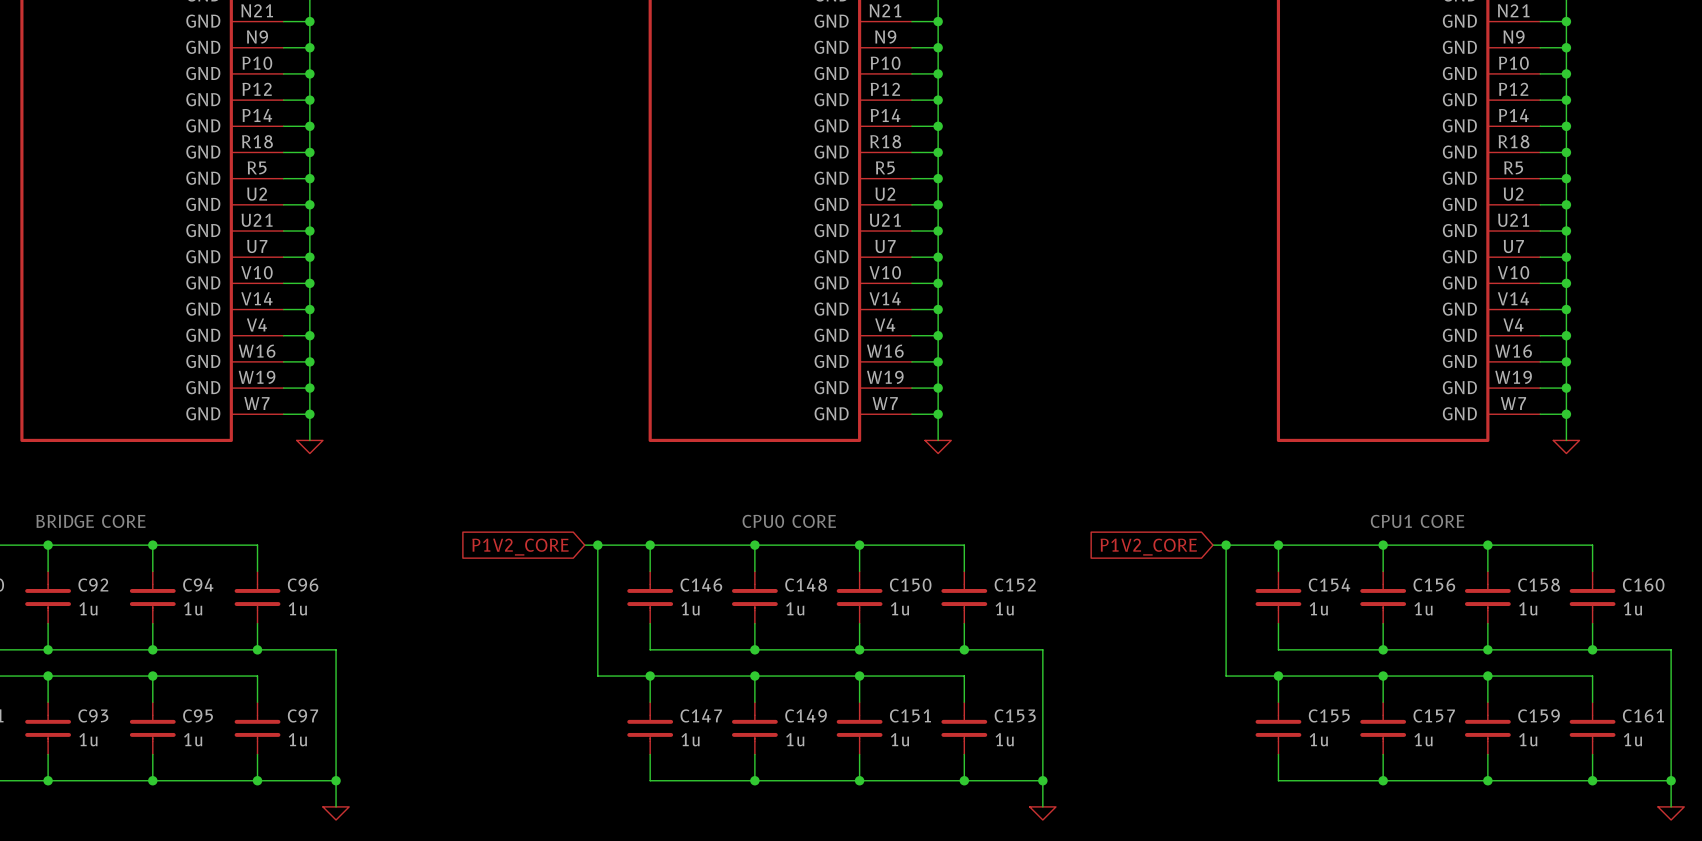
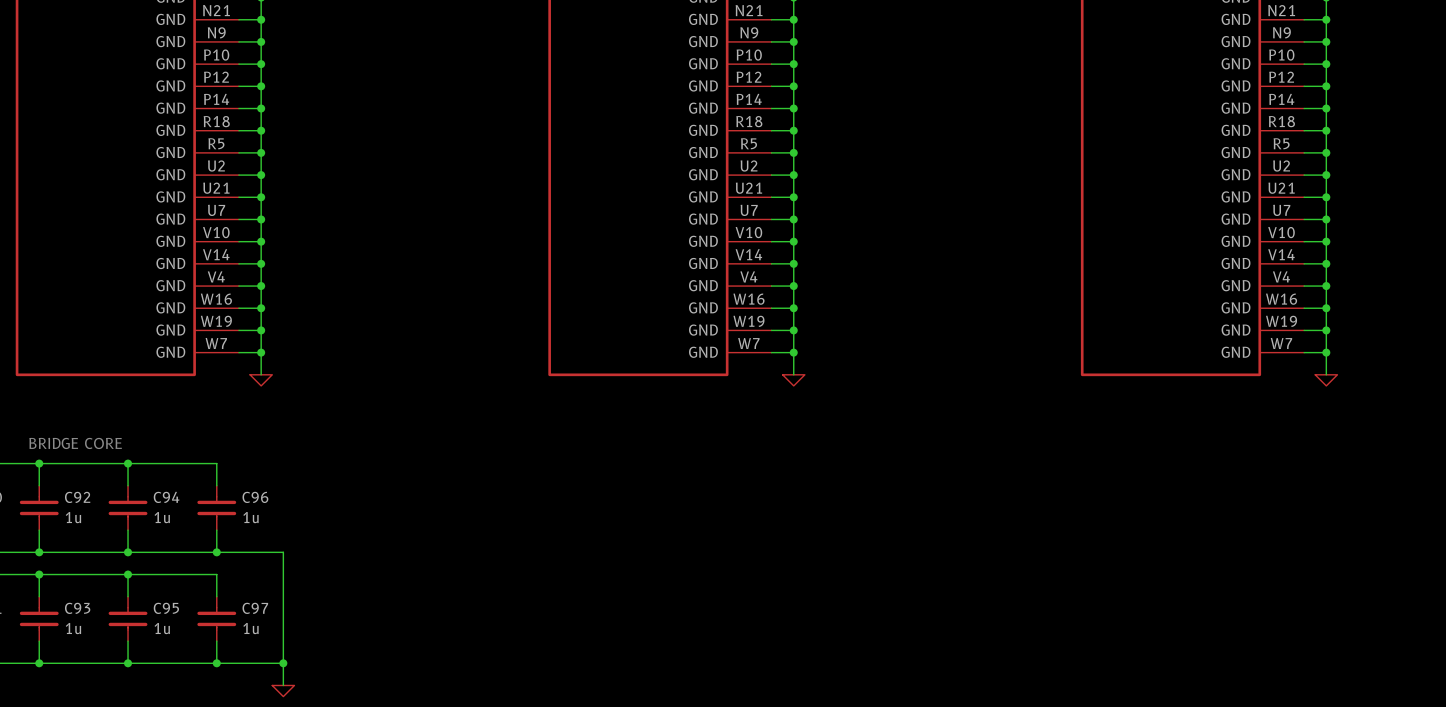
text: CPU0 CORE (789, 521) -> none
text: CPU1 CORE (1417, 521) -> none
wire: (584, 545) (964, 545) (964, 571) -> none
wire: (597, 545) (597, 676) (964, 676) (964, 702) -> none
junction: (597, 545) -> none
wire: (650, 545) (650, 571) -> none
junction: (650, 545) -> none
wire: (754, 545) (754, 571) -> none
junction: (754, 545) -> none
wire: (859, 545) (859, 571) -> none
junction: (859, 545) -> none
wire: (1213, 545) (1592, 545) (1592, 571) -> none
wire: (1226, 545) (1226, 676) (1592, 676) (1592, 702) -> none
junction: (1226, 545) -> none
wire: (1278, 545) (1278, 571) -> none
junction: (1278, 545) -> none
wire: (1383, 545) (1383, 571) -> none
junction: (1383, 545) -> none
wire: (1487, 545) (1487, 571) -> none
junction: (1487, 545) -> none
global label: P1V2_CORE (520, 547) -> none
global label: P1V2_CORE (1148, 547) -> none
C146: 1u (650, 597) -> none
C148: 1u (754, 597) -> none
C150: 1u (859, 597) -> none
C152: 1u (964, 597) -> none
C154: 1u (1278, 597) -> none
C156: 1u (1383, 597) -> none
C158: 1u (1487, 597) -> none
C160: 1u (1592, 597) -> none
wire: (650, 623) (650, 649) (1042, 649) (1042, 806) -> none
wire: (754, 623) (754, 649) -> none
wire: (859, 623) (859, 649) -> none
wire: (964, 623) (964, 649) -> none
wire: (1278, 623) (1278, 649) (1671, 649) (1671, 806) -> none
wire: (1383, 623) (1383, 649) -> none
wire: (1487, 623) (1487, 649) -> none
wire: (1592, 623) (1592, 649) -> none
junction: (754, 649) -> none
junction: (859, 649) -> none
junction: (964, 649) -> none
junction: (1383, 649) -> none
junction: (1487, 649) -> none
junction: (1592, 649) -> none
wire: (650, 676) (650, 702) -> none
junction: (650, 676) -> none
wire: (754, 676) (754, 702) -> none
junction: (754, 676) -> none
wire: (859, 676) (859, 702) -> none
junction: (859, 676) -> none
wire: (1278, 676) (1278, 702) -> none
junction: (1278, 676) -> none
wire: (1383, 676) (1383, 702) -> none
junction: (1383, 676) -> none
wire: (1487, 676) (1487, 702) -> none
junction: (1487, 676) -> none
C147: 1u (650, 728) -> none
C149: 1u (754, 728) -> none
C151: 1u (859, 728) -> none
C153: 1u (964, 728) -> none
C155: 1u (1278, 728) -> none
C157: 1u (1383, 728) -> none
C159: 1u (1487, 728) -> none
C161: 1u (1592, 728) -> none
wire: (650, 754) (650, 780) (1042, 780) -> none
wire: (754, 754) (754, 780) -> none
wire: (859, 754) (859, 780) -> none
wire: (964, 754) (964, 780) -> none
wire: (1278, 754) (1278, 780) (1671, 780) -> none
wire: (1383, 754) (1383, 780) -> none
wire: (1487, 754) (1487, 780) -> none
wire: (1592, 754) (1592, 780) -> none
junction: (754, 780) -> none
junction: (859, 780) -> none
junction: (964, 780) -> none
junction: (1042, 780) -> none
junction: (1383, 780) -> none
junction: (1487, 780) -> none
junction: (1592, 780) -> none
junction: (1671, 780) -> none
power symbol: (1042, 813) -> none
power symbol: (1671, 813) -> none

